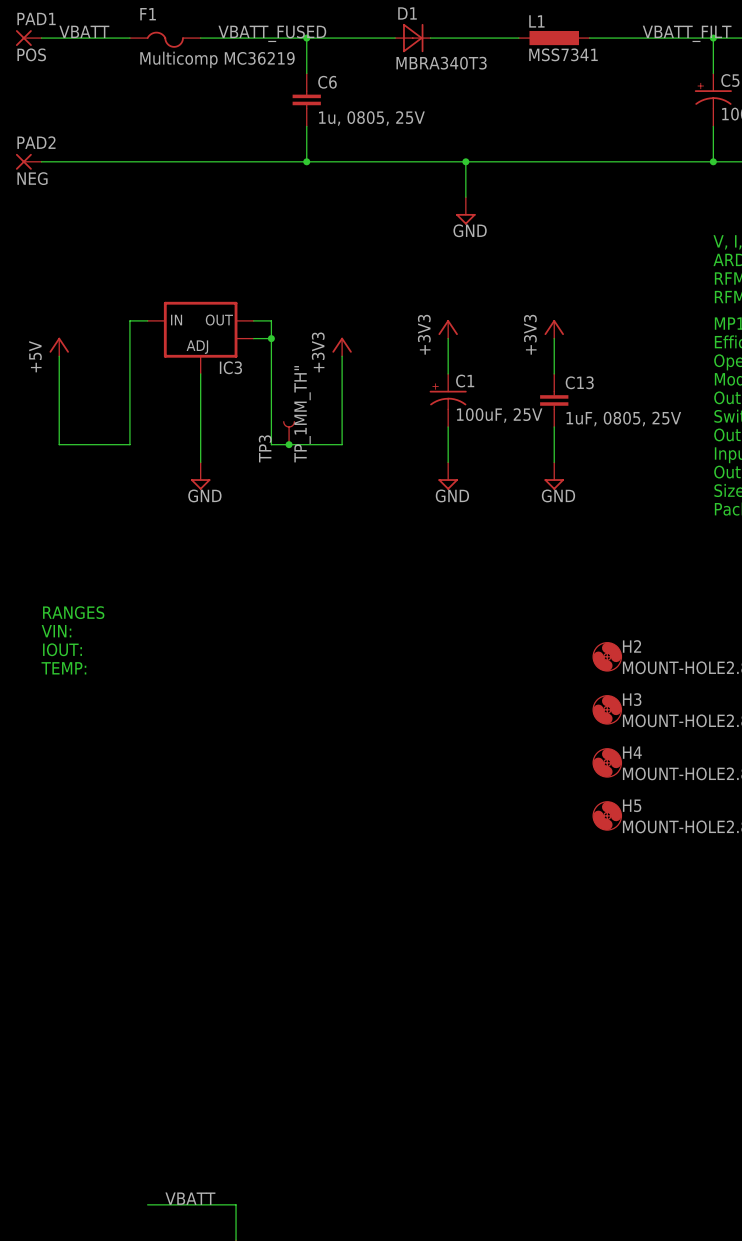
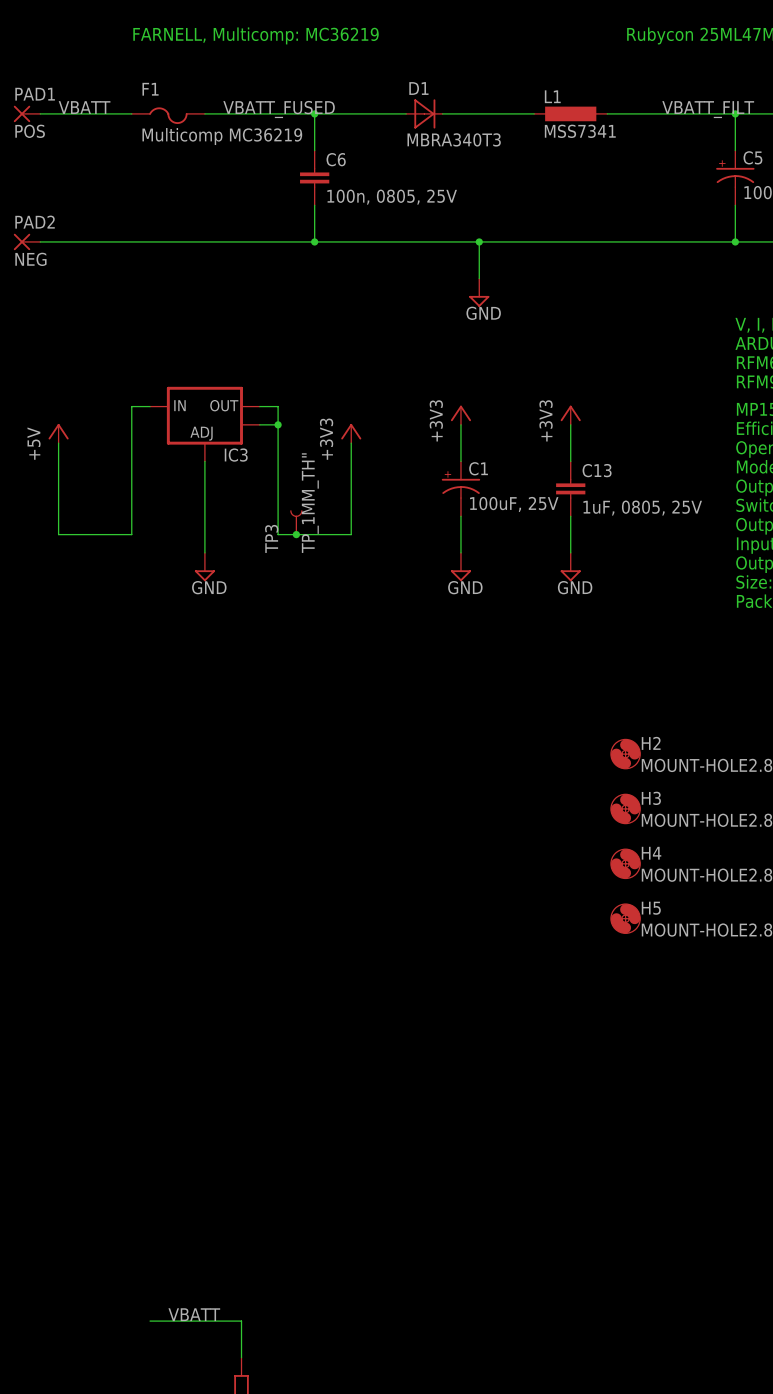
C6 value: 1u, 0805, 25V (371, 118) -> 100n, 0805, 25V (392, 197)
text: RANGES (73, 612) -> none
text: VIN: (56, 631) -> none
text: IOUT: (62, 649) -> none
text: TEMP: (63, 668) -> none

